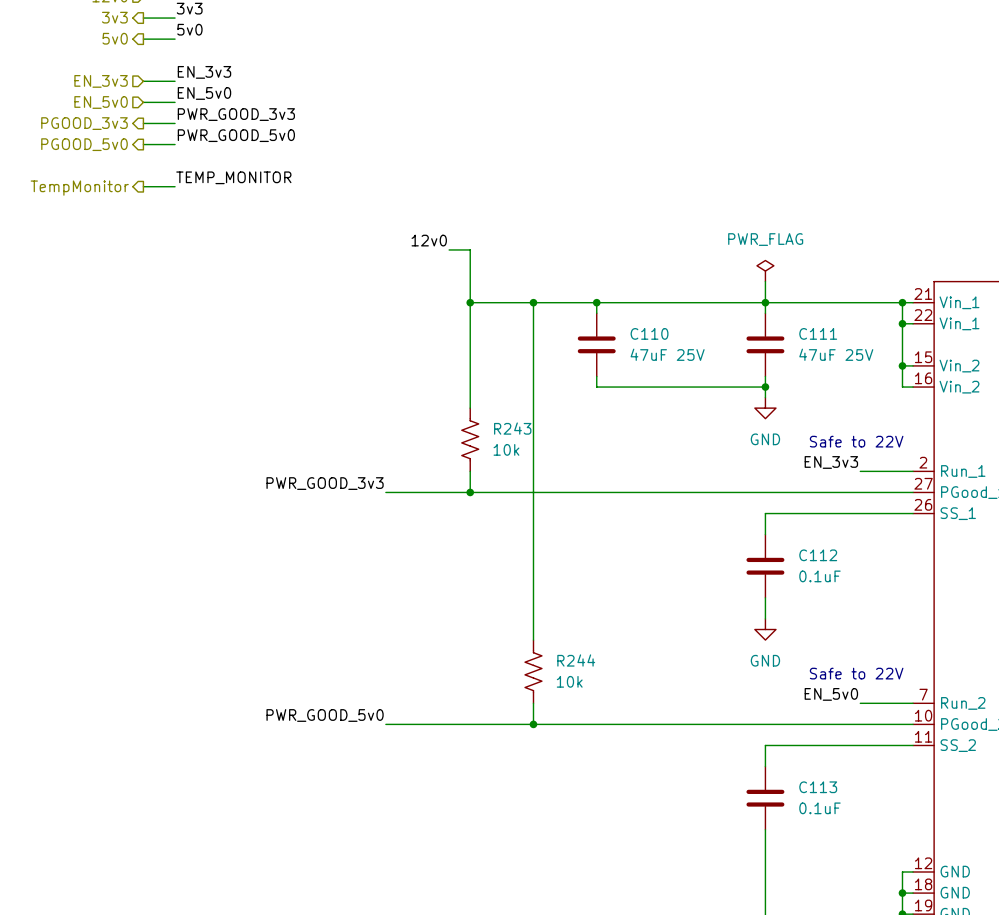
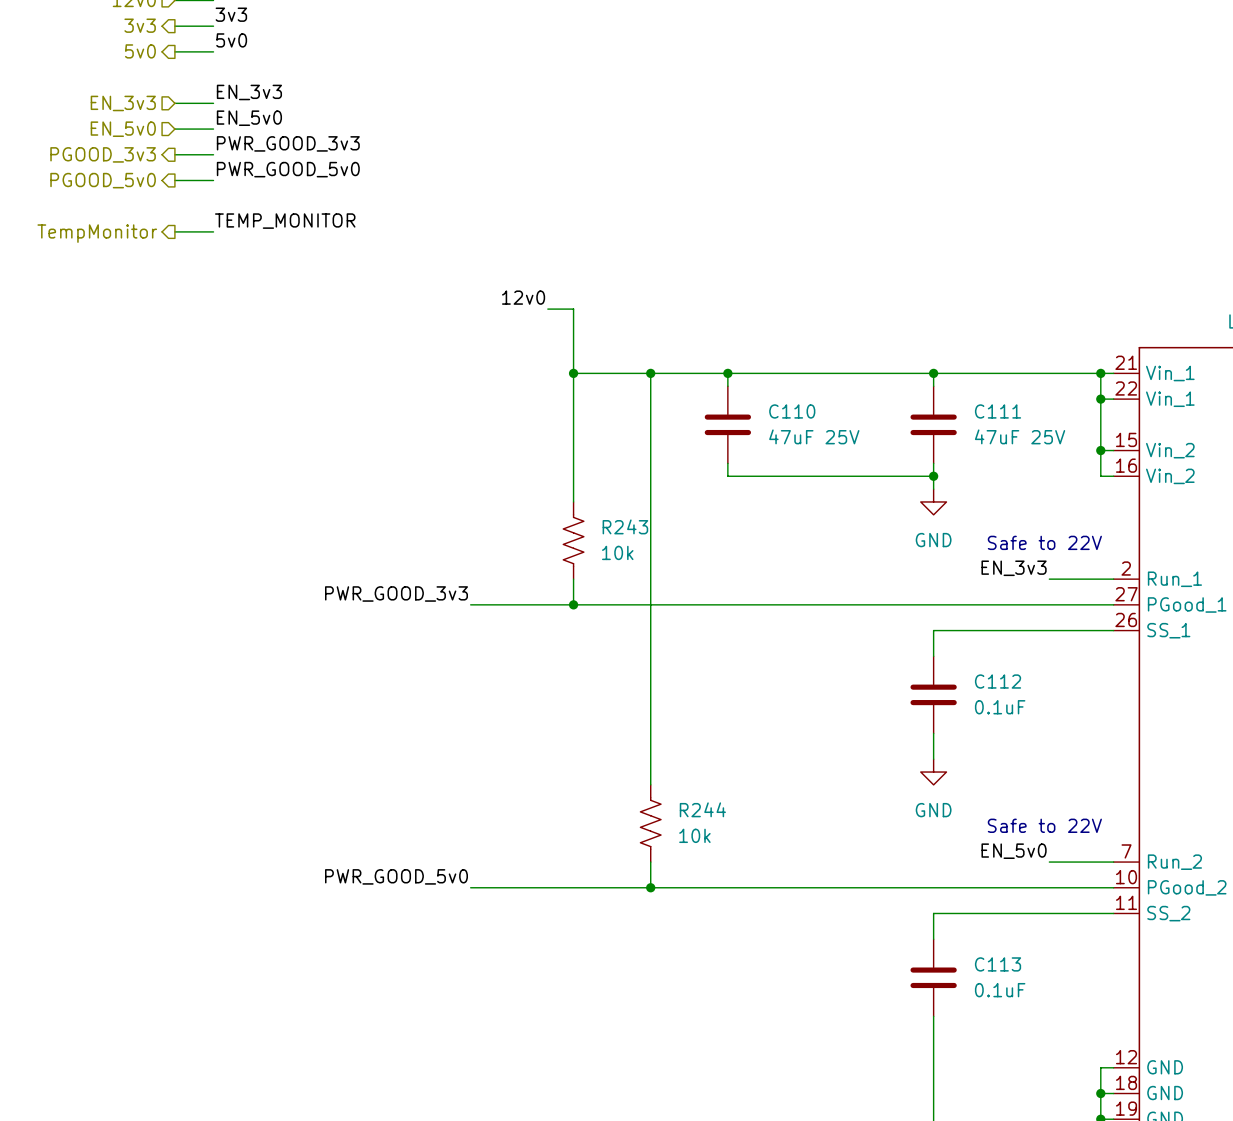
power symbol: PWR_FLAG (765, 271) -> none
wire: (765, 281) (765, 302) -> none

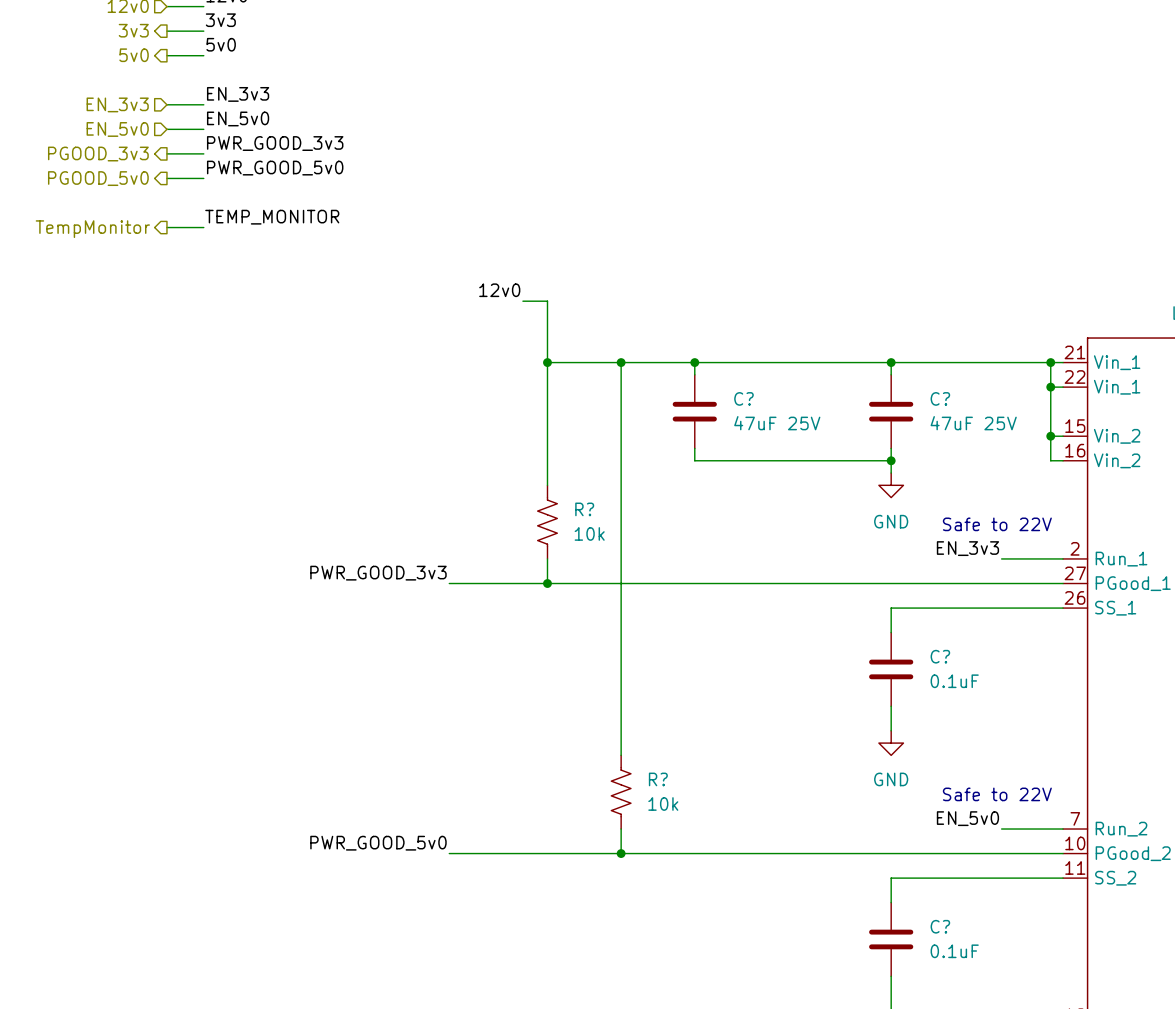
C110 name: C110 (792, 411) -> C? (743, 398)
C111 name: C111 (998, 411) -> C? (940, 398)
R243 name: R243 (625, 526) -> R? (584, 509)
C112 name: C112 (998, 681) -> C? (940, 656)
R244 name: R244 (702, 809) -> R? (658, 779)
C113 name: C113 (998, 964) -> C? (940, 926)

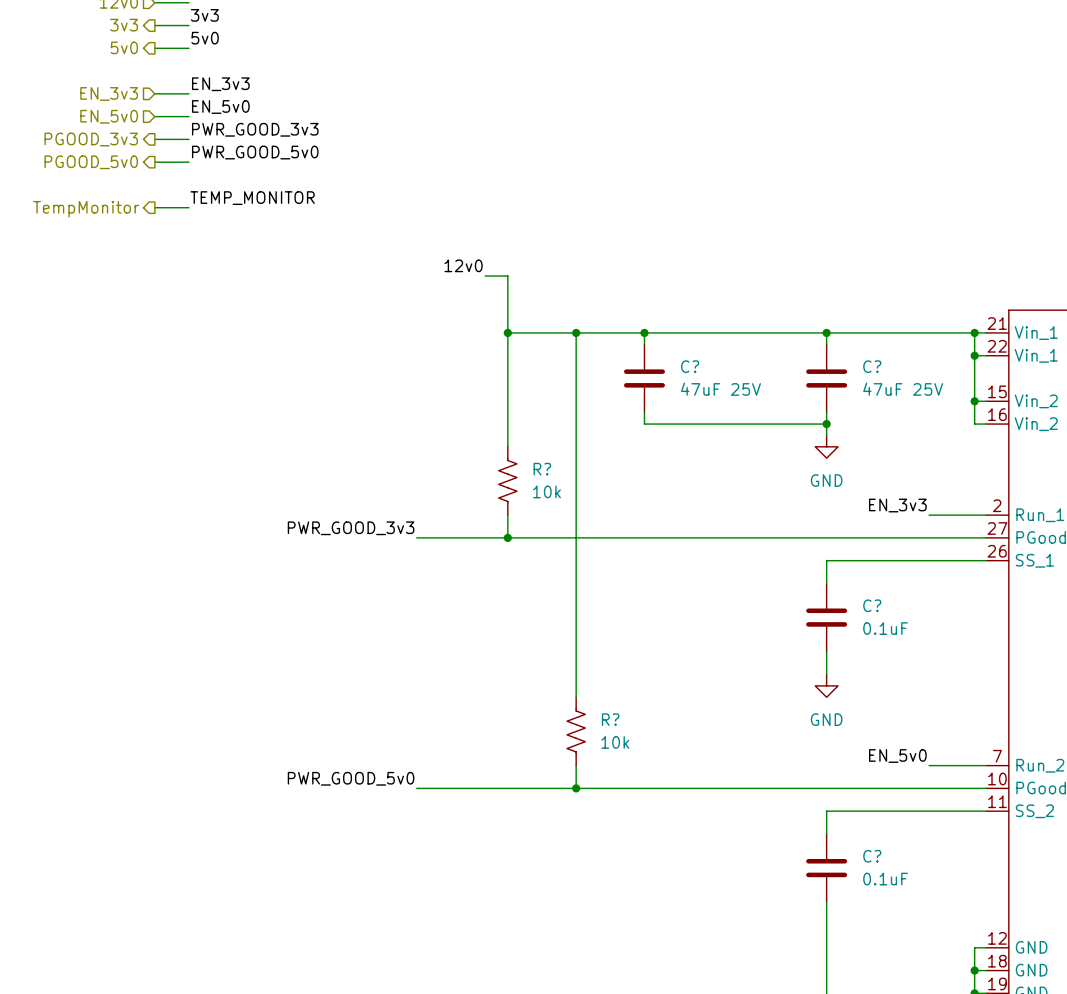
text: Safe to 22V (997, 524) -> none
text: Safe to 22V (997, 794) -> none

